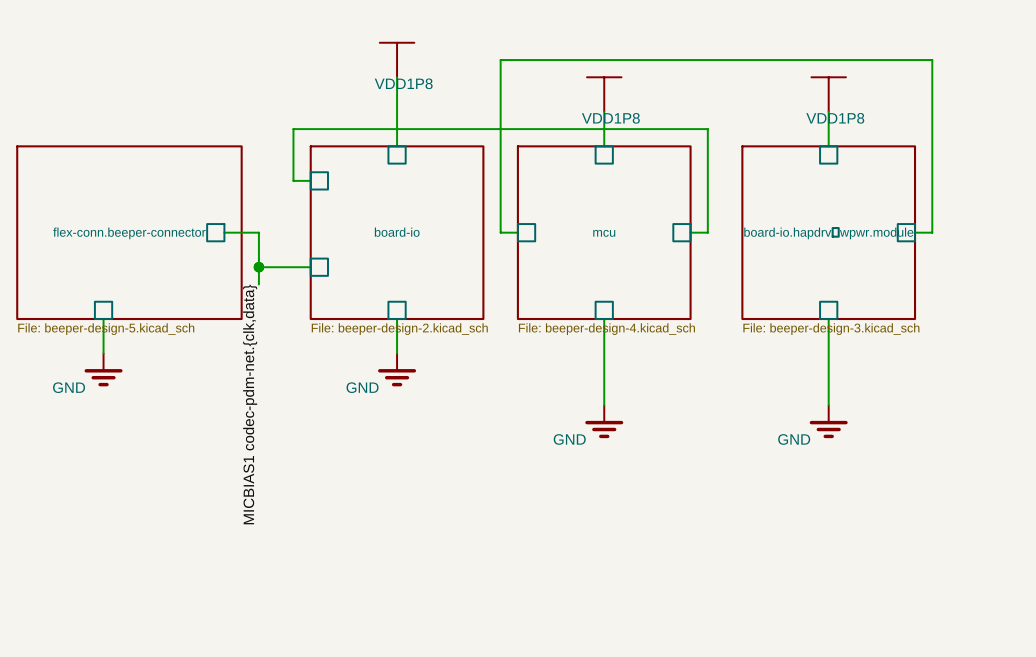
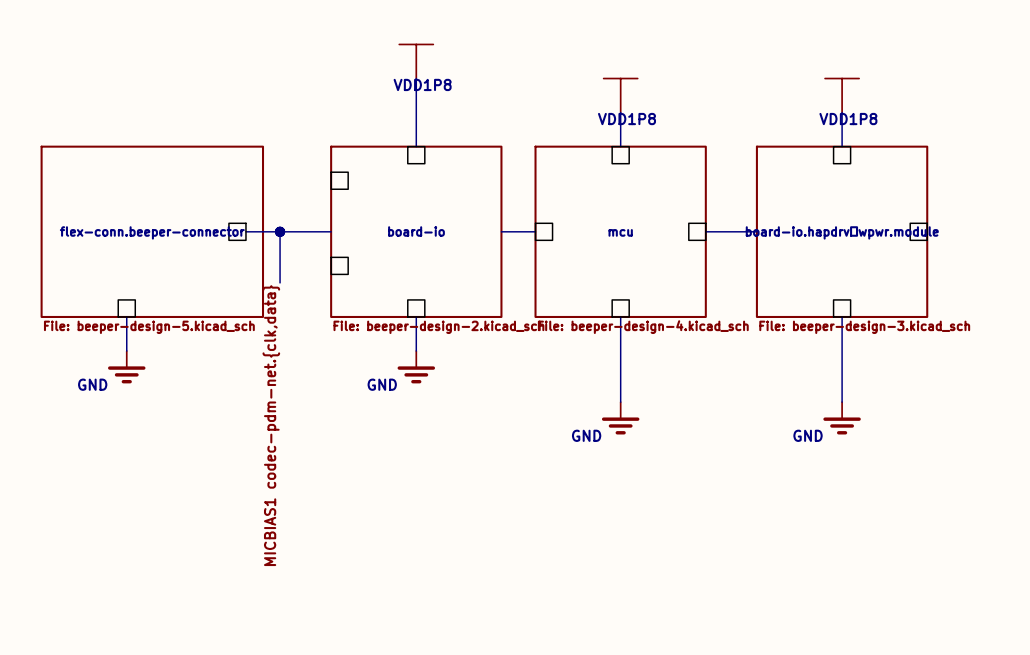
wire: (310, 180) (293, 180) (293, 129) (707, 129) (707, 232) -> (756, 231) (722, 231)
wire: (500, 232) (500, 60) (932, 60) (932, 232) (915, 232) -> (518, 231) (501, 231)
wire: (258, 267) (310, 267) -> (280, 231) (331, 231)
junction position: (258, 267) -> (280, 231)

